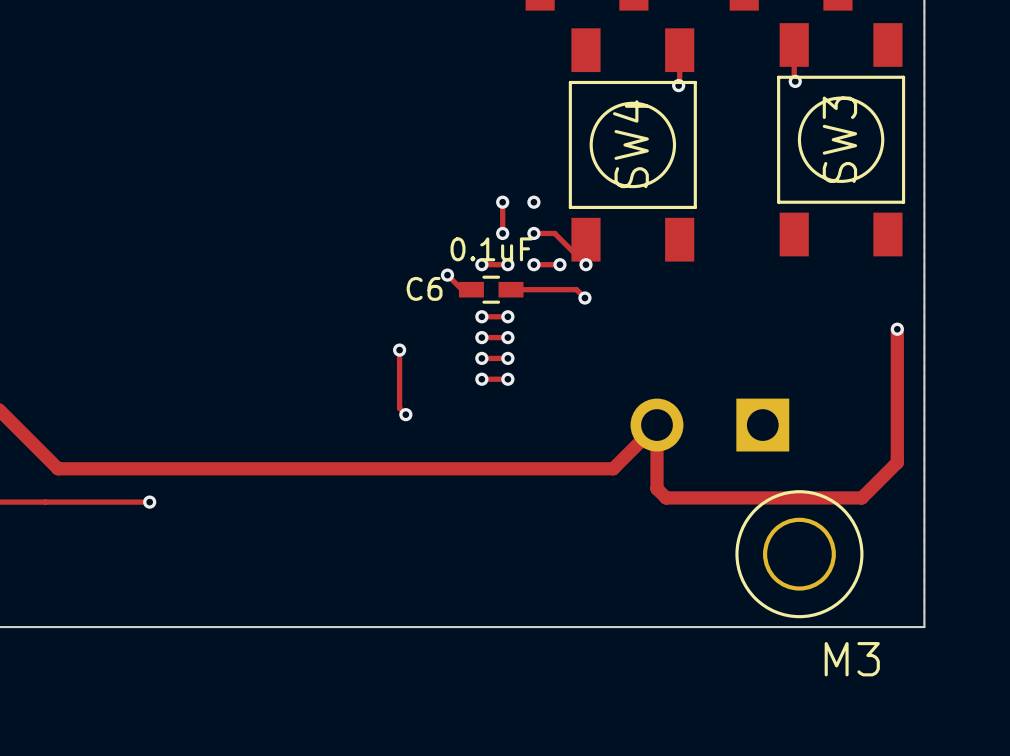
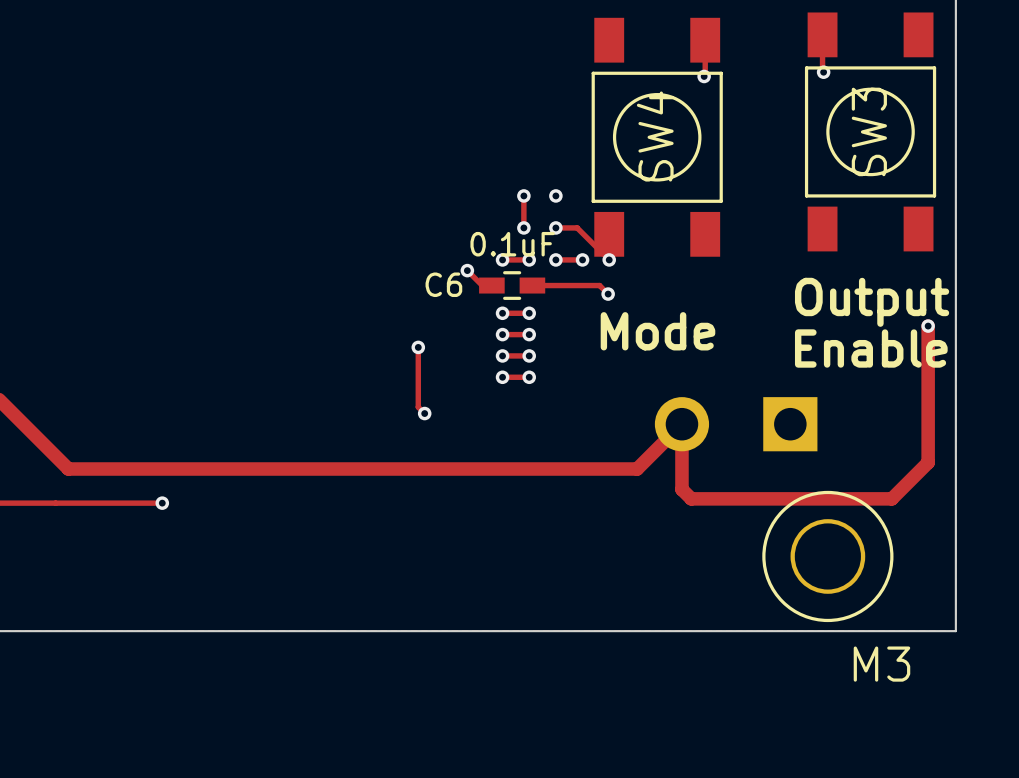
text: none -> Output (872, 302)
text: none -> Mode (657, 331)
text: none -> Enable (871, 348)

